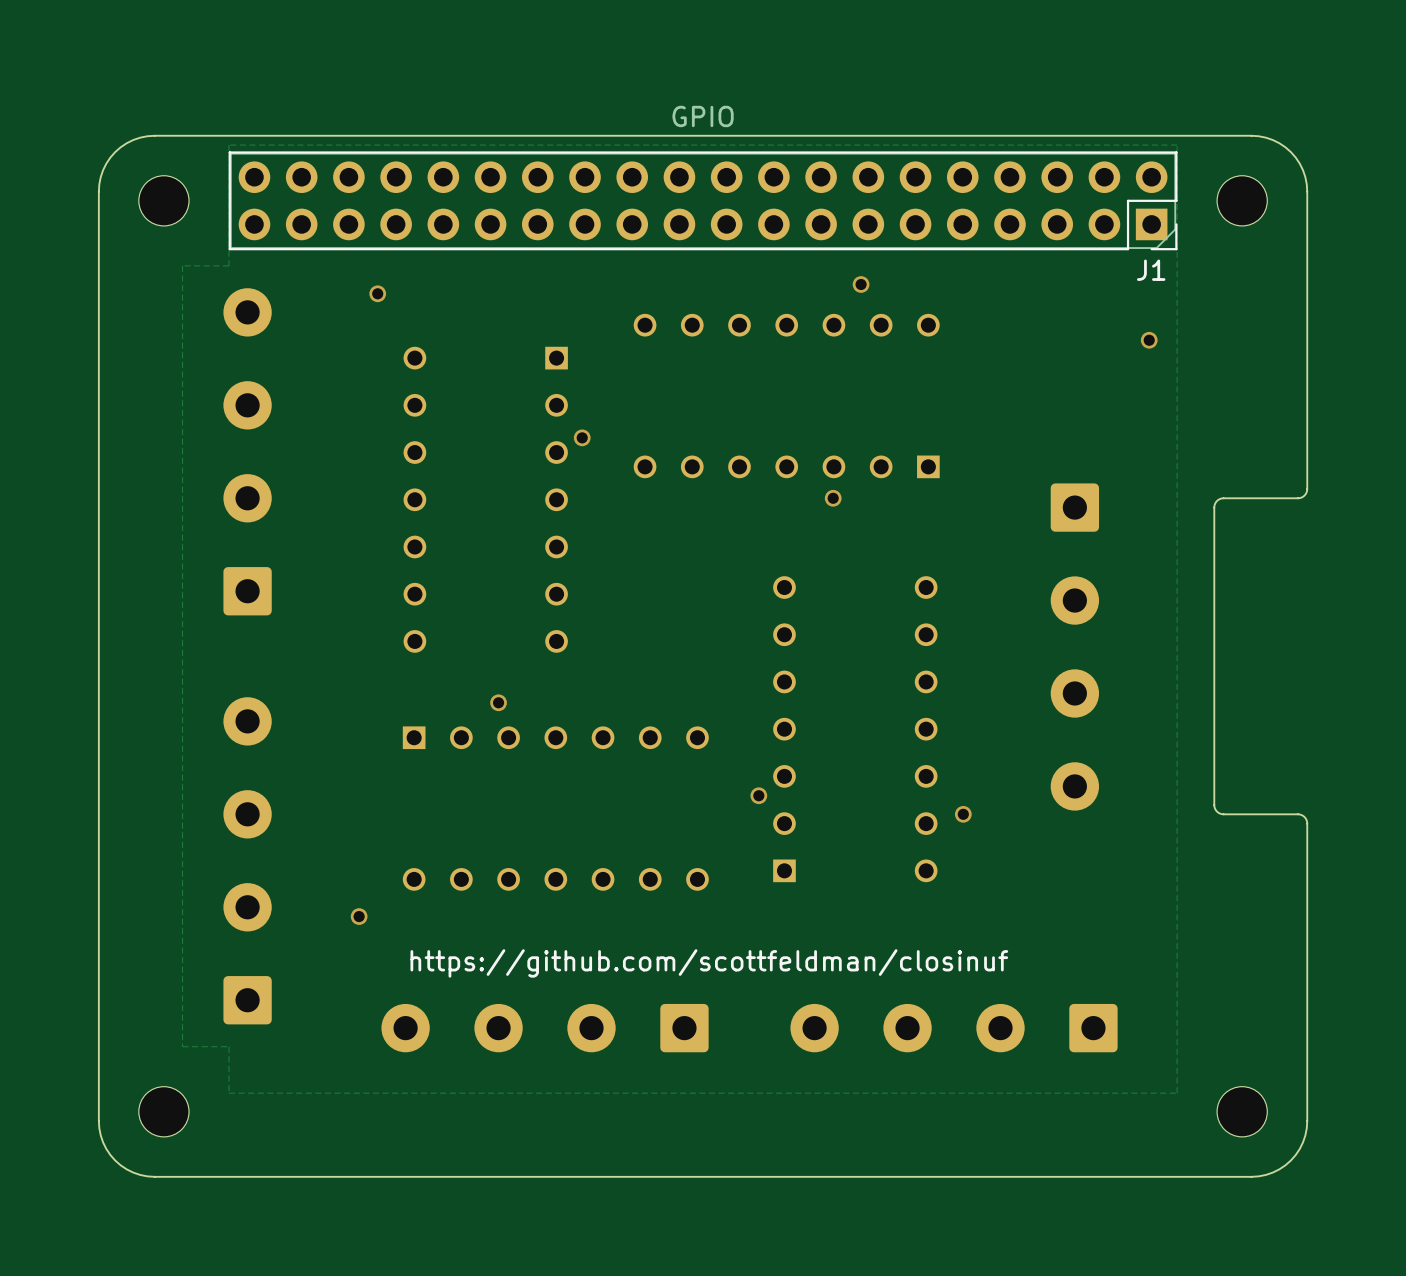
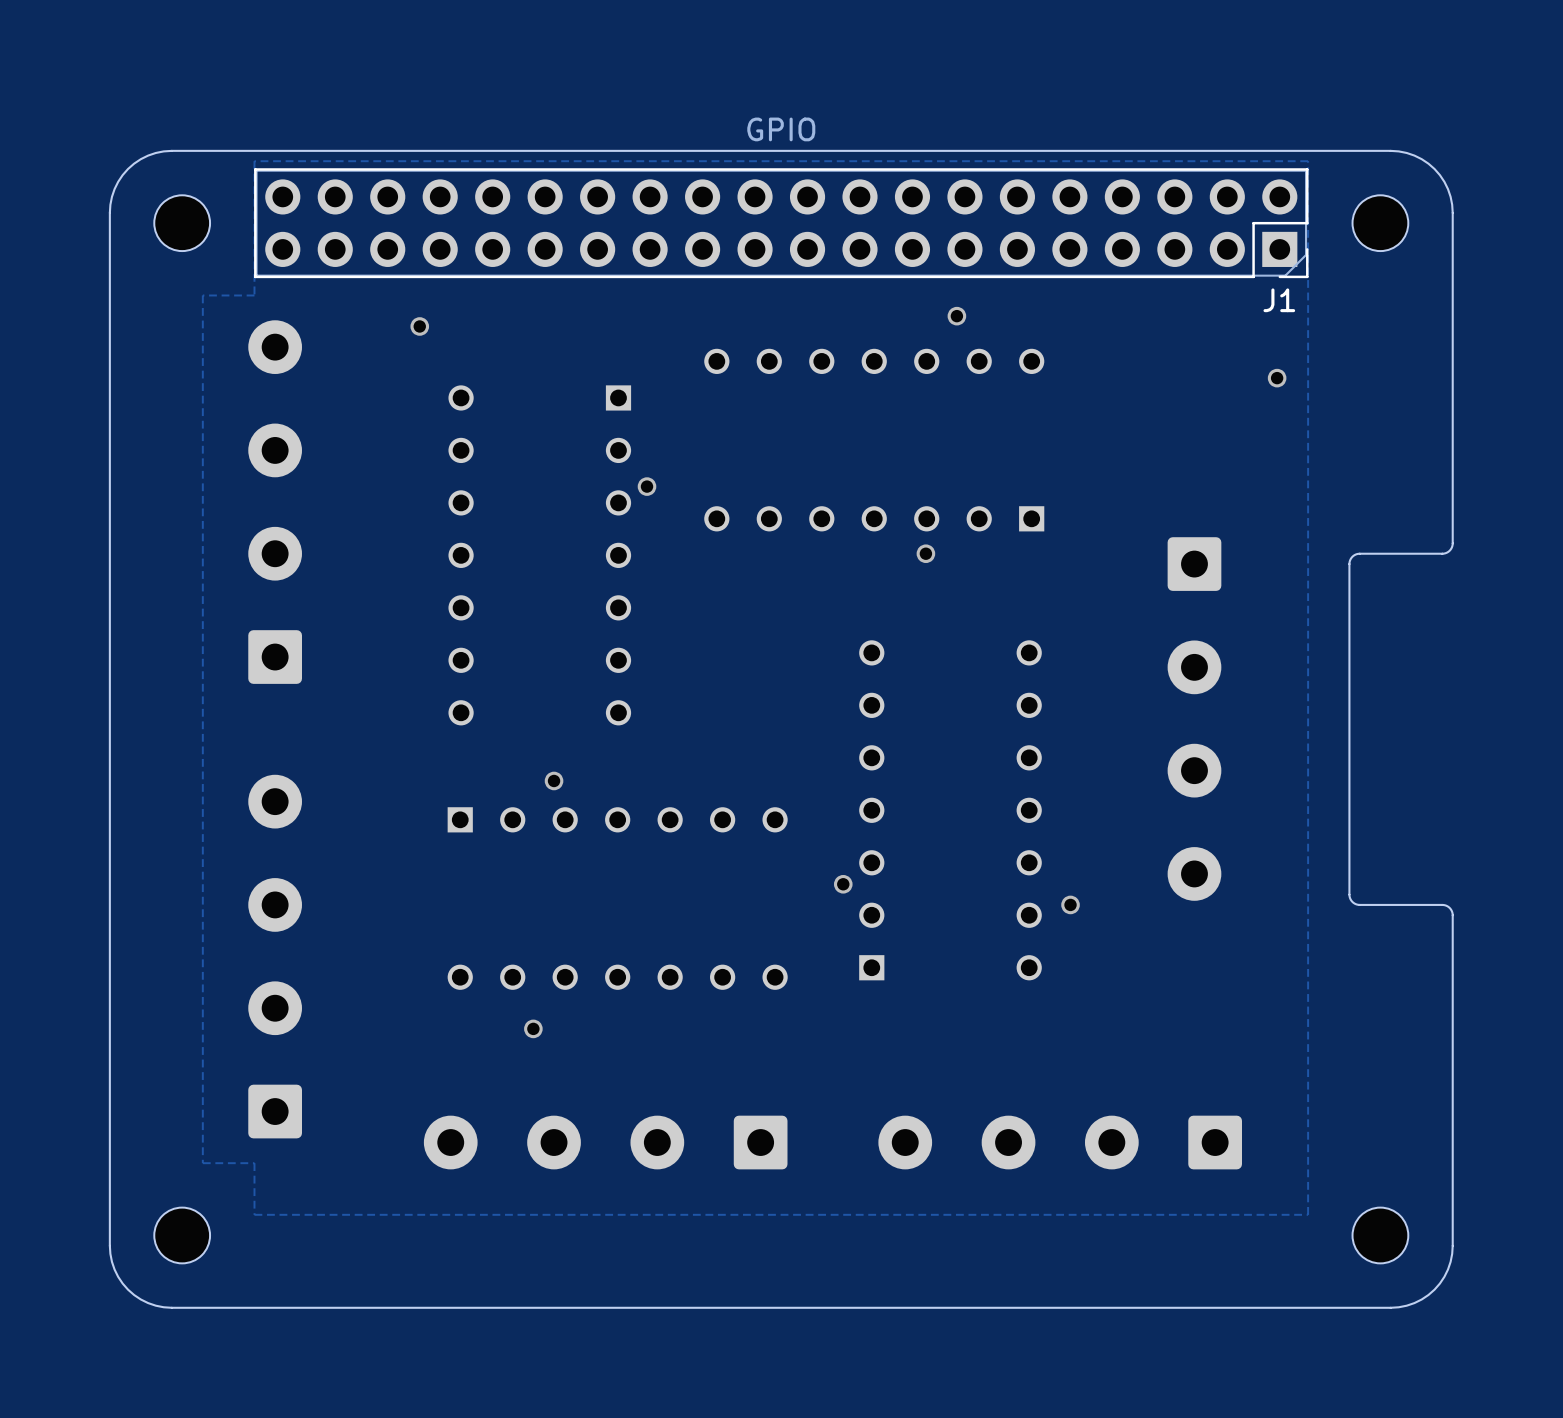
via: (359, 916) -> none
via: none -> (533, 1028)
text: https://github.com/scottfeldman/closinuf (709, 963) -> none

